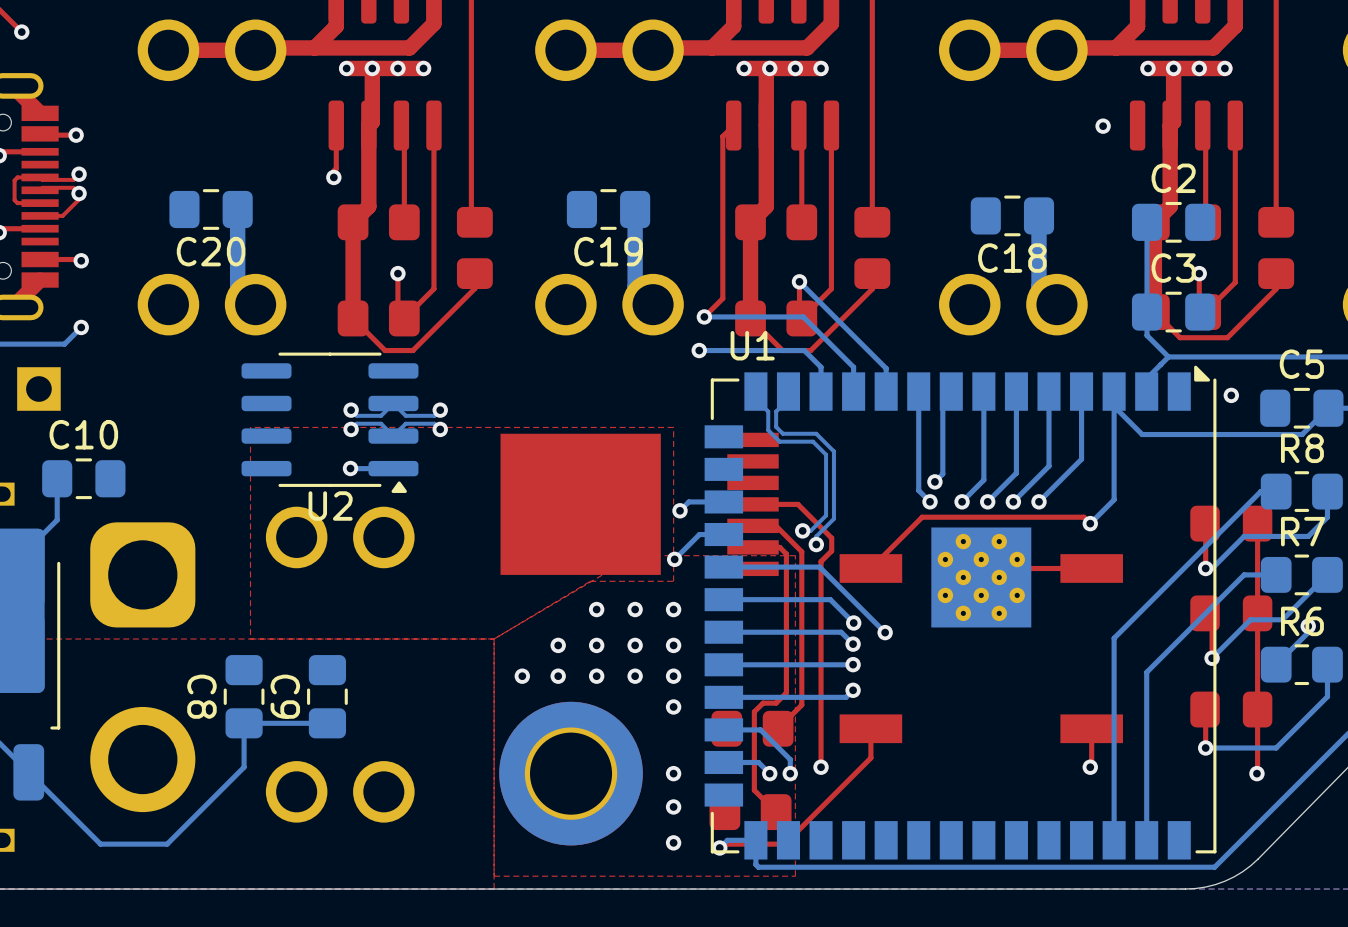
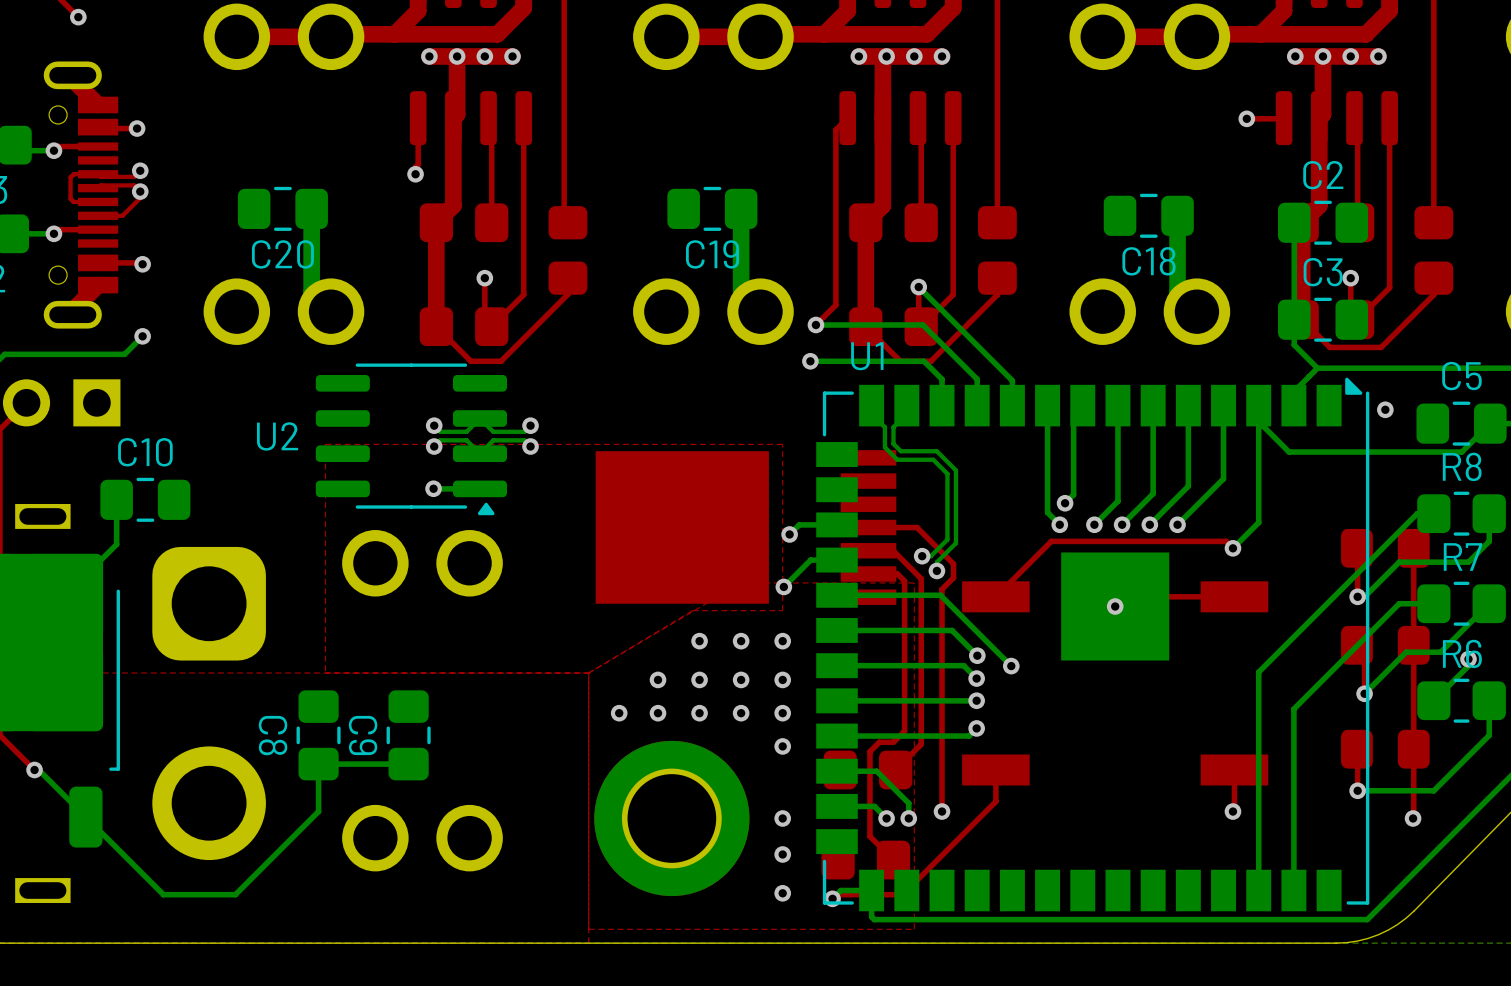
top track: none -> (1284, 118) (1246, 118)
U1 footprint: [704, 365, 1217, 860] -> [816, 377, 1370, 912]
U2 name position: U2 (330, 506) -> U2 (277, 436)
via: none -> (1115, 606)

